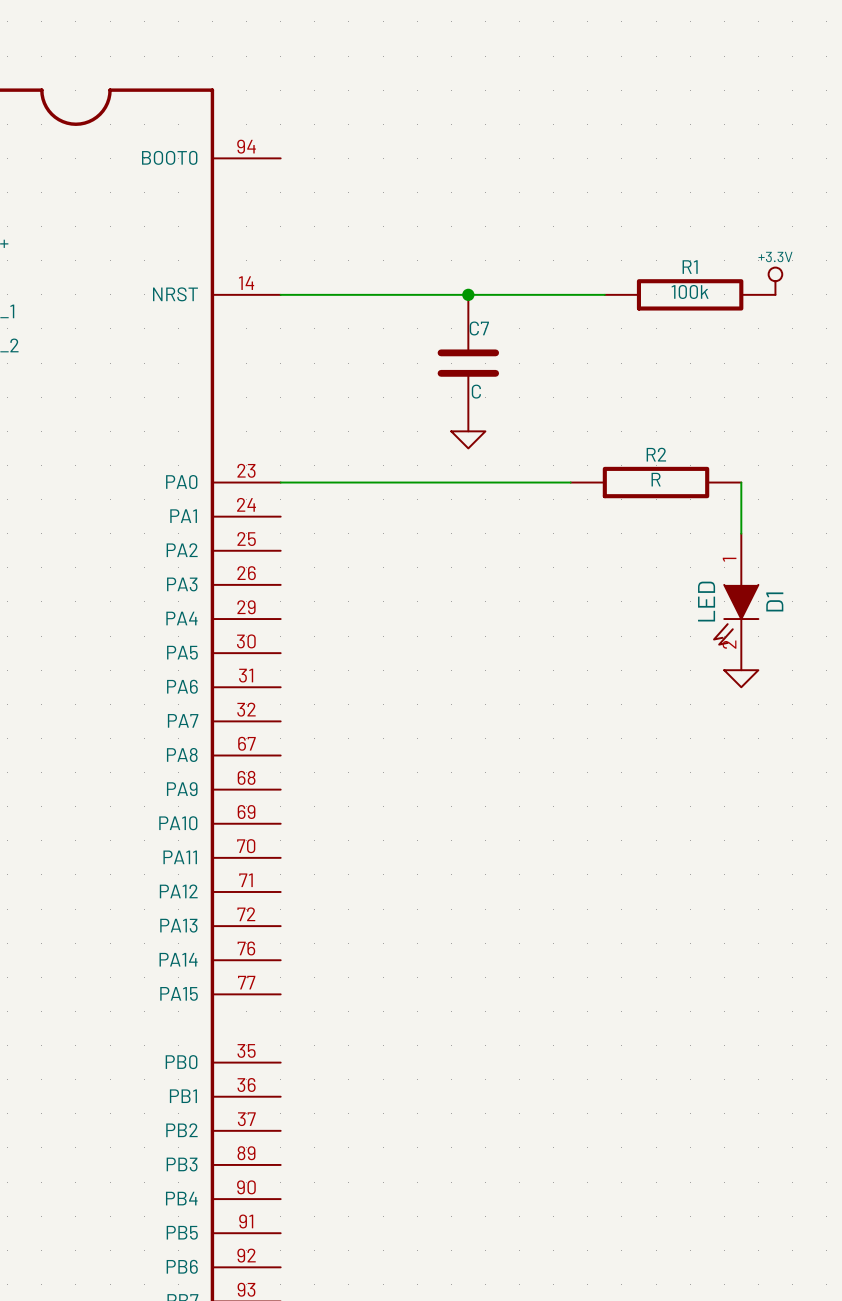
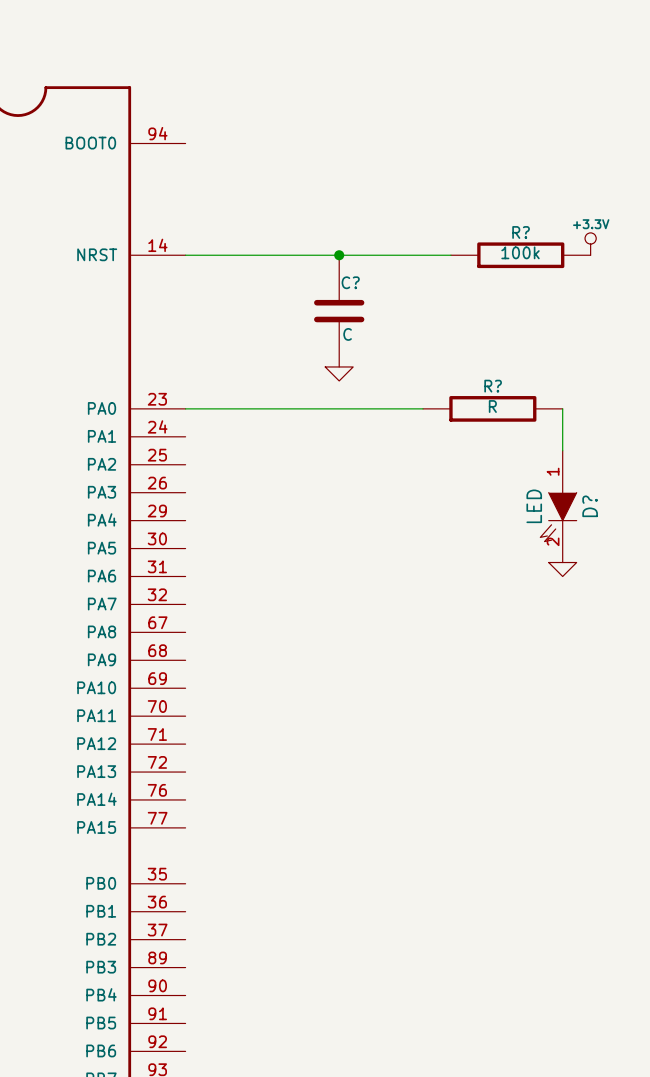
R1 name: R1 (690, 267) -> R? (521, 232)
C7 name: C7 (479, 328) -> C? (350, 282)
R2 name: R2 (656, 454) -> R? (493, 386)
D1 name: D1 (774, 601) -> D? (590, 506)

